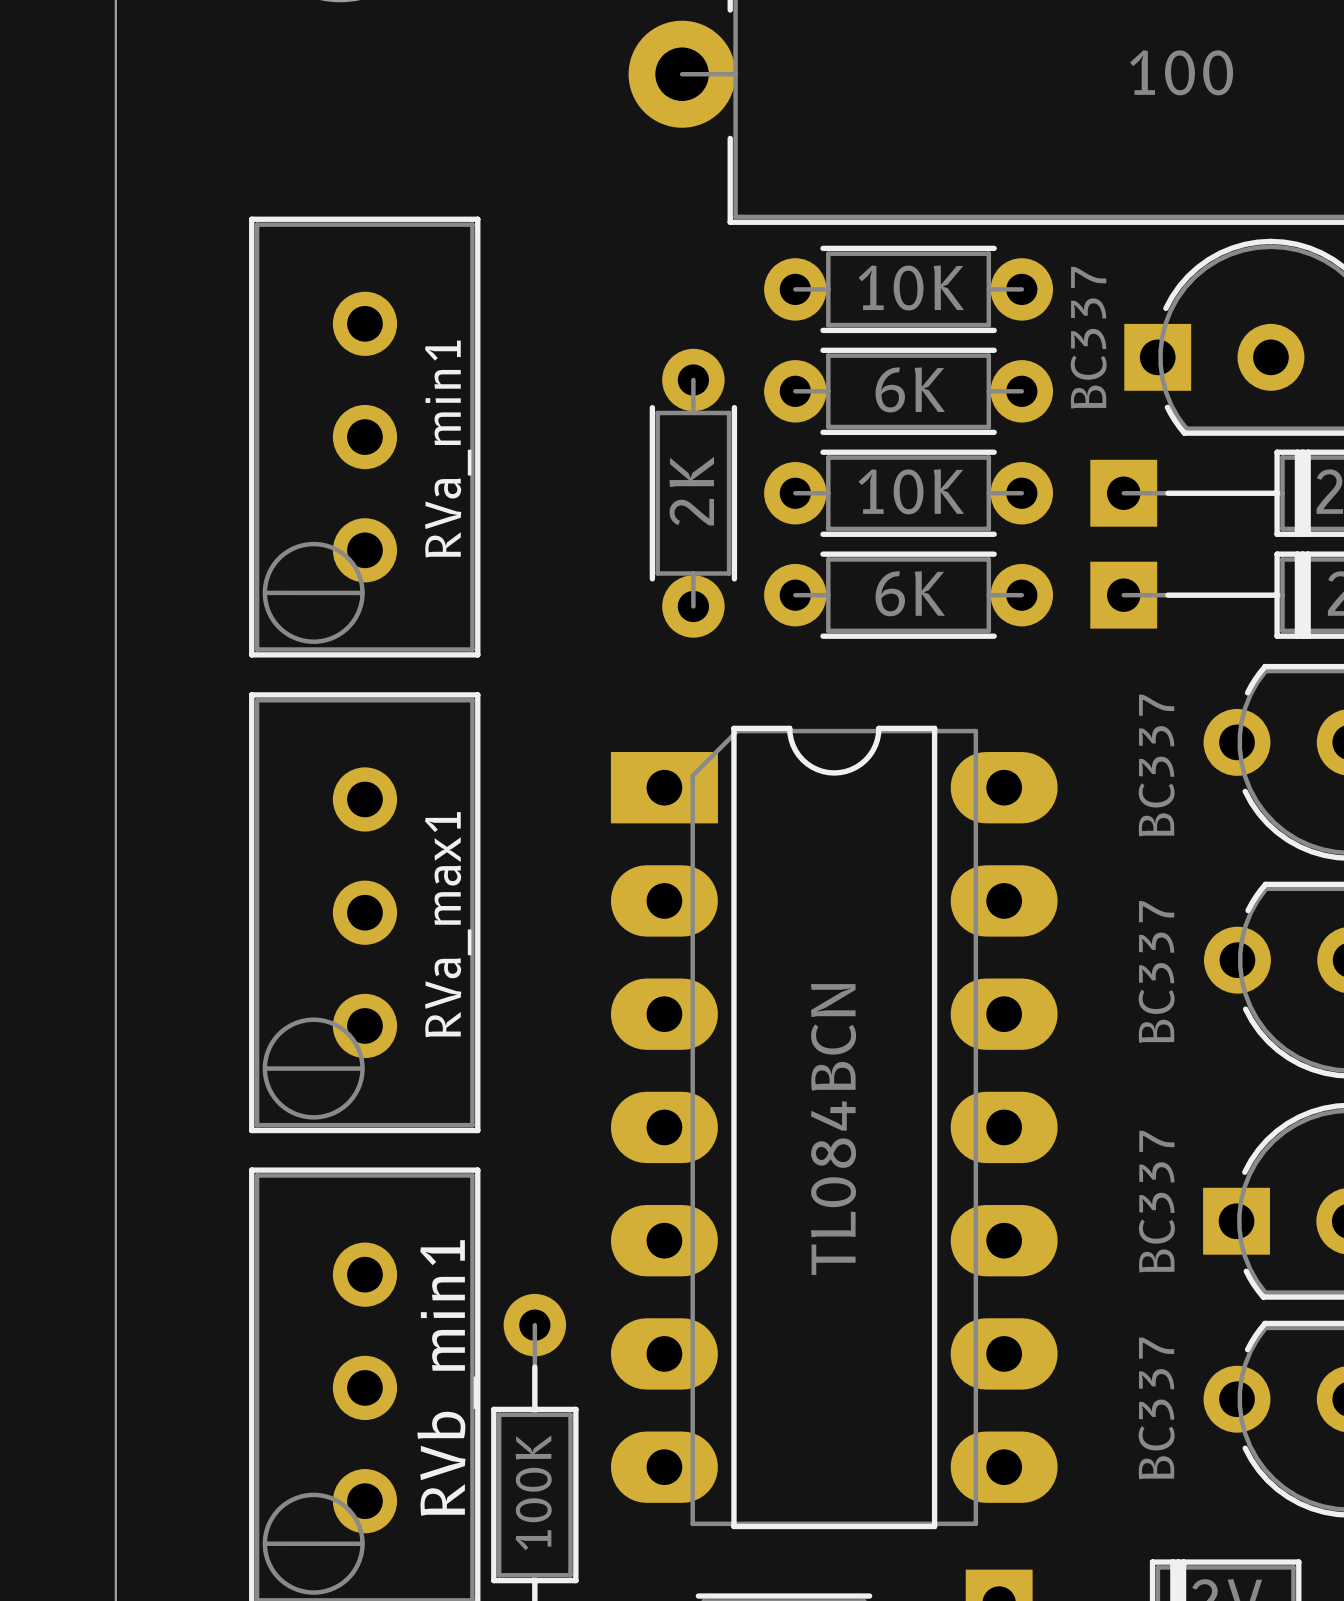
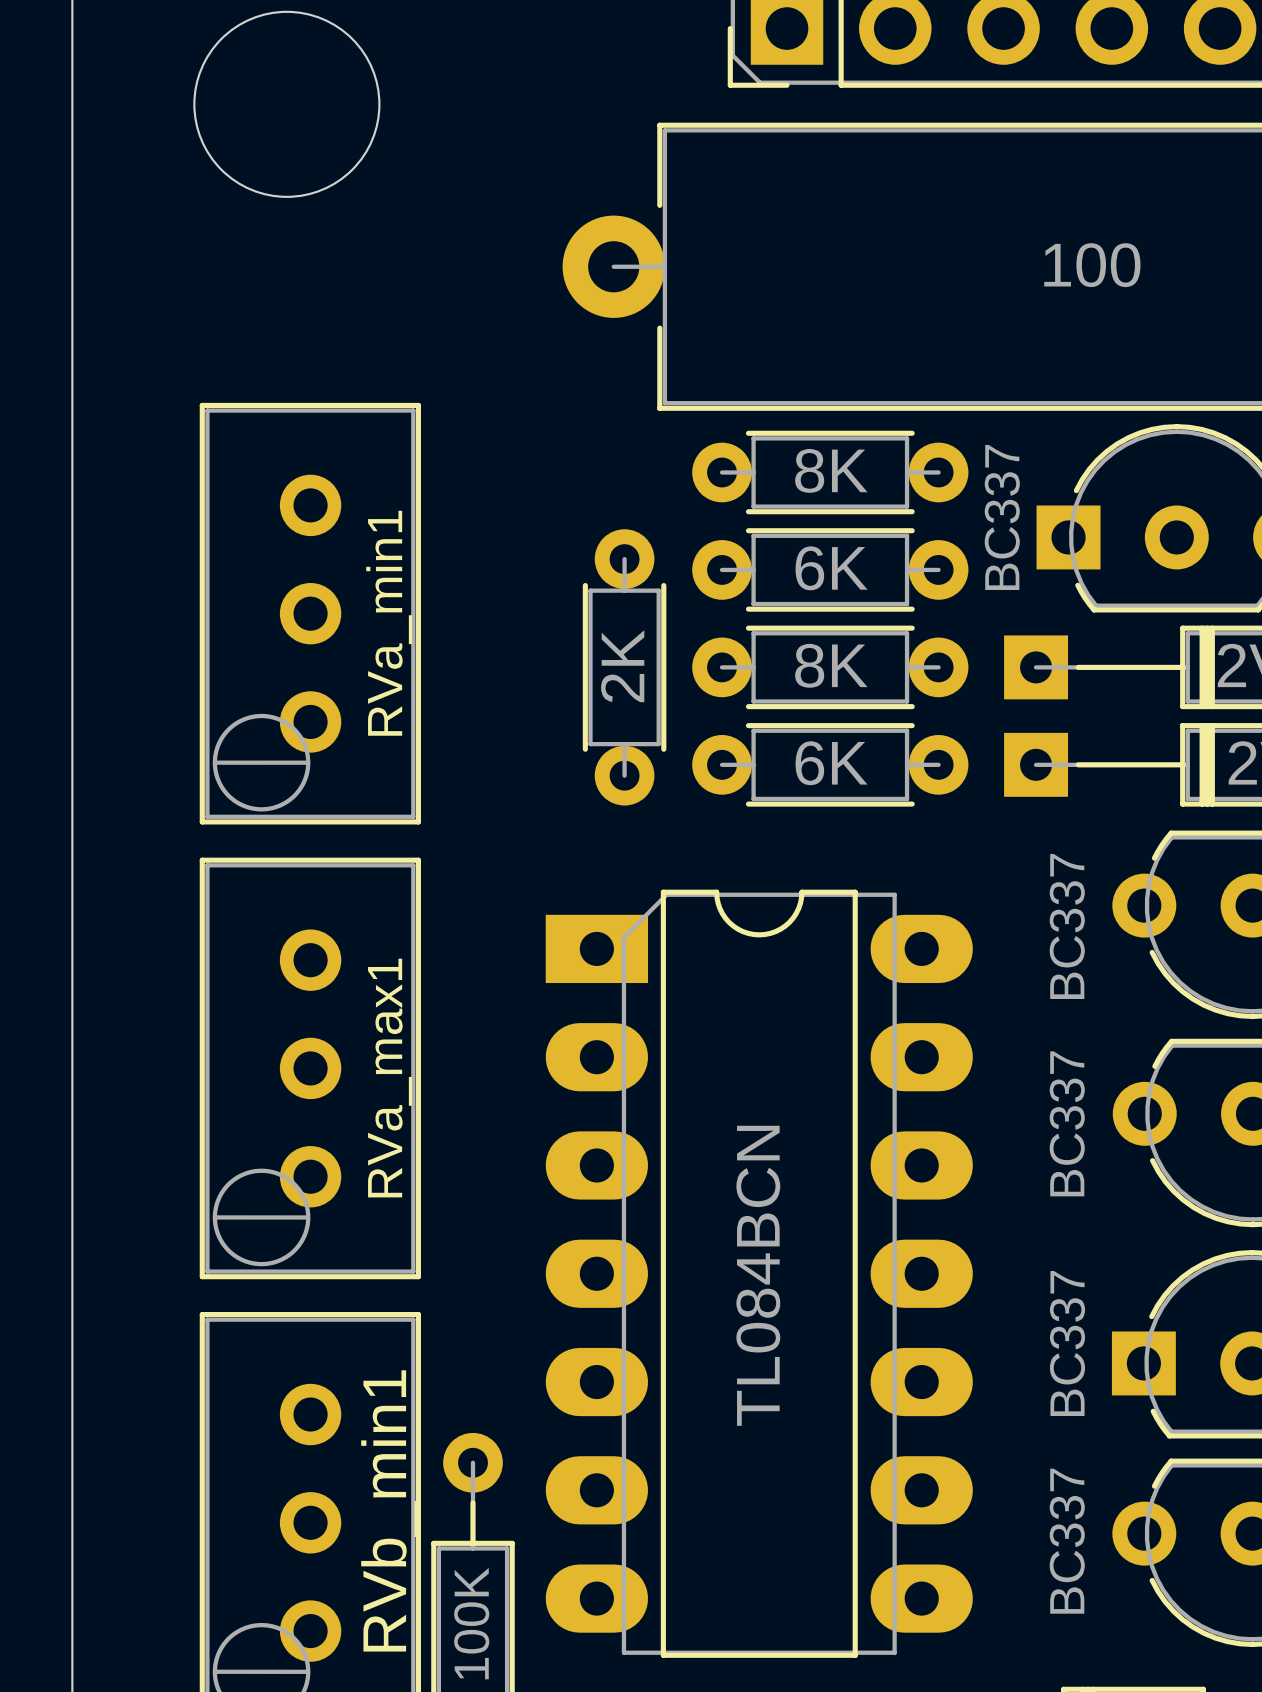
part value: 10K (911, 287) -> 8K (831, 470)
part value: 10K (911, 491) -> 8K (831, 665)

